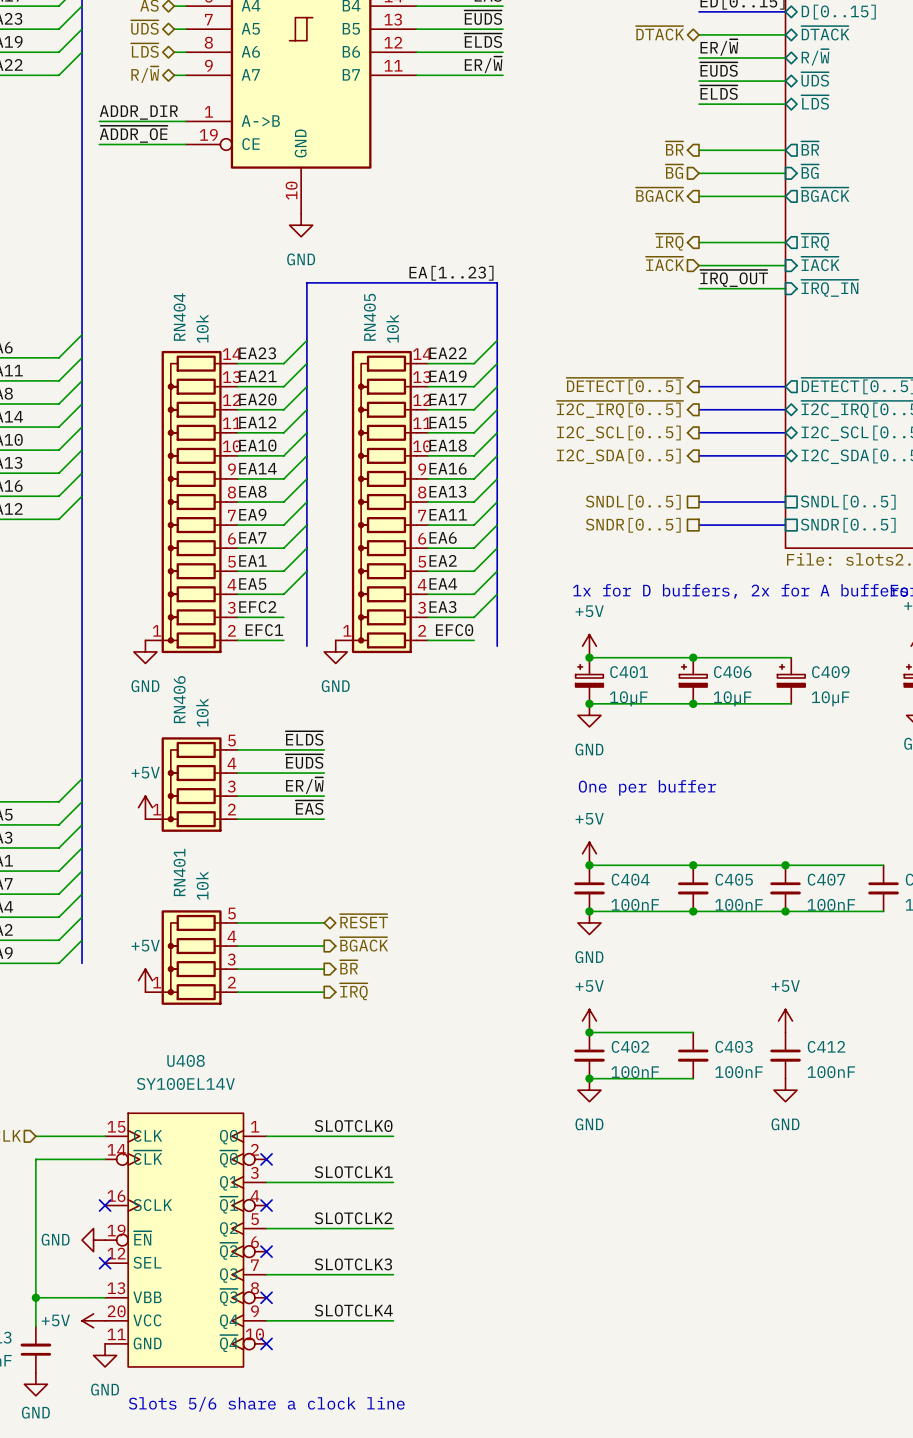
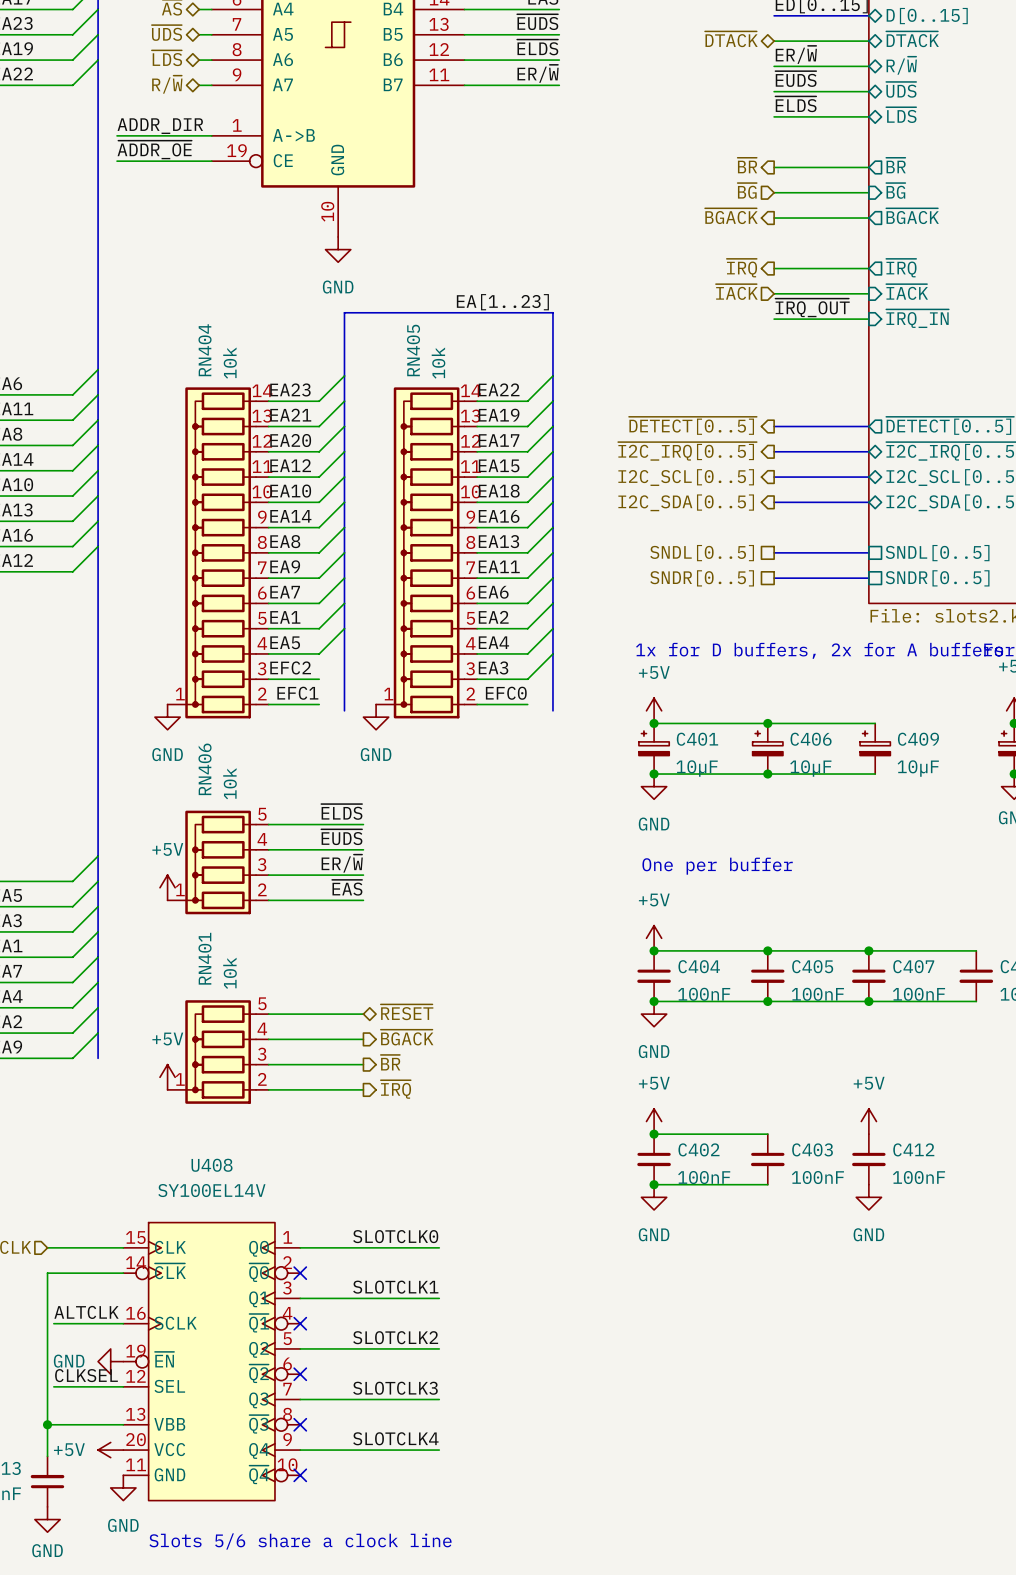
label: none -> ALTCLK (86, 1312)
wire: none -> (53, 1323) (123, 1323)
no-connect mark: (105, 1205) -> none
label: none -> CLKSEL (86, 1375)
wire: none -> (53, 1386) (123, 1386)
no-connect mark: (105, 1263) -> none

